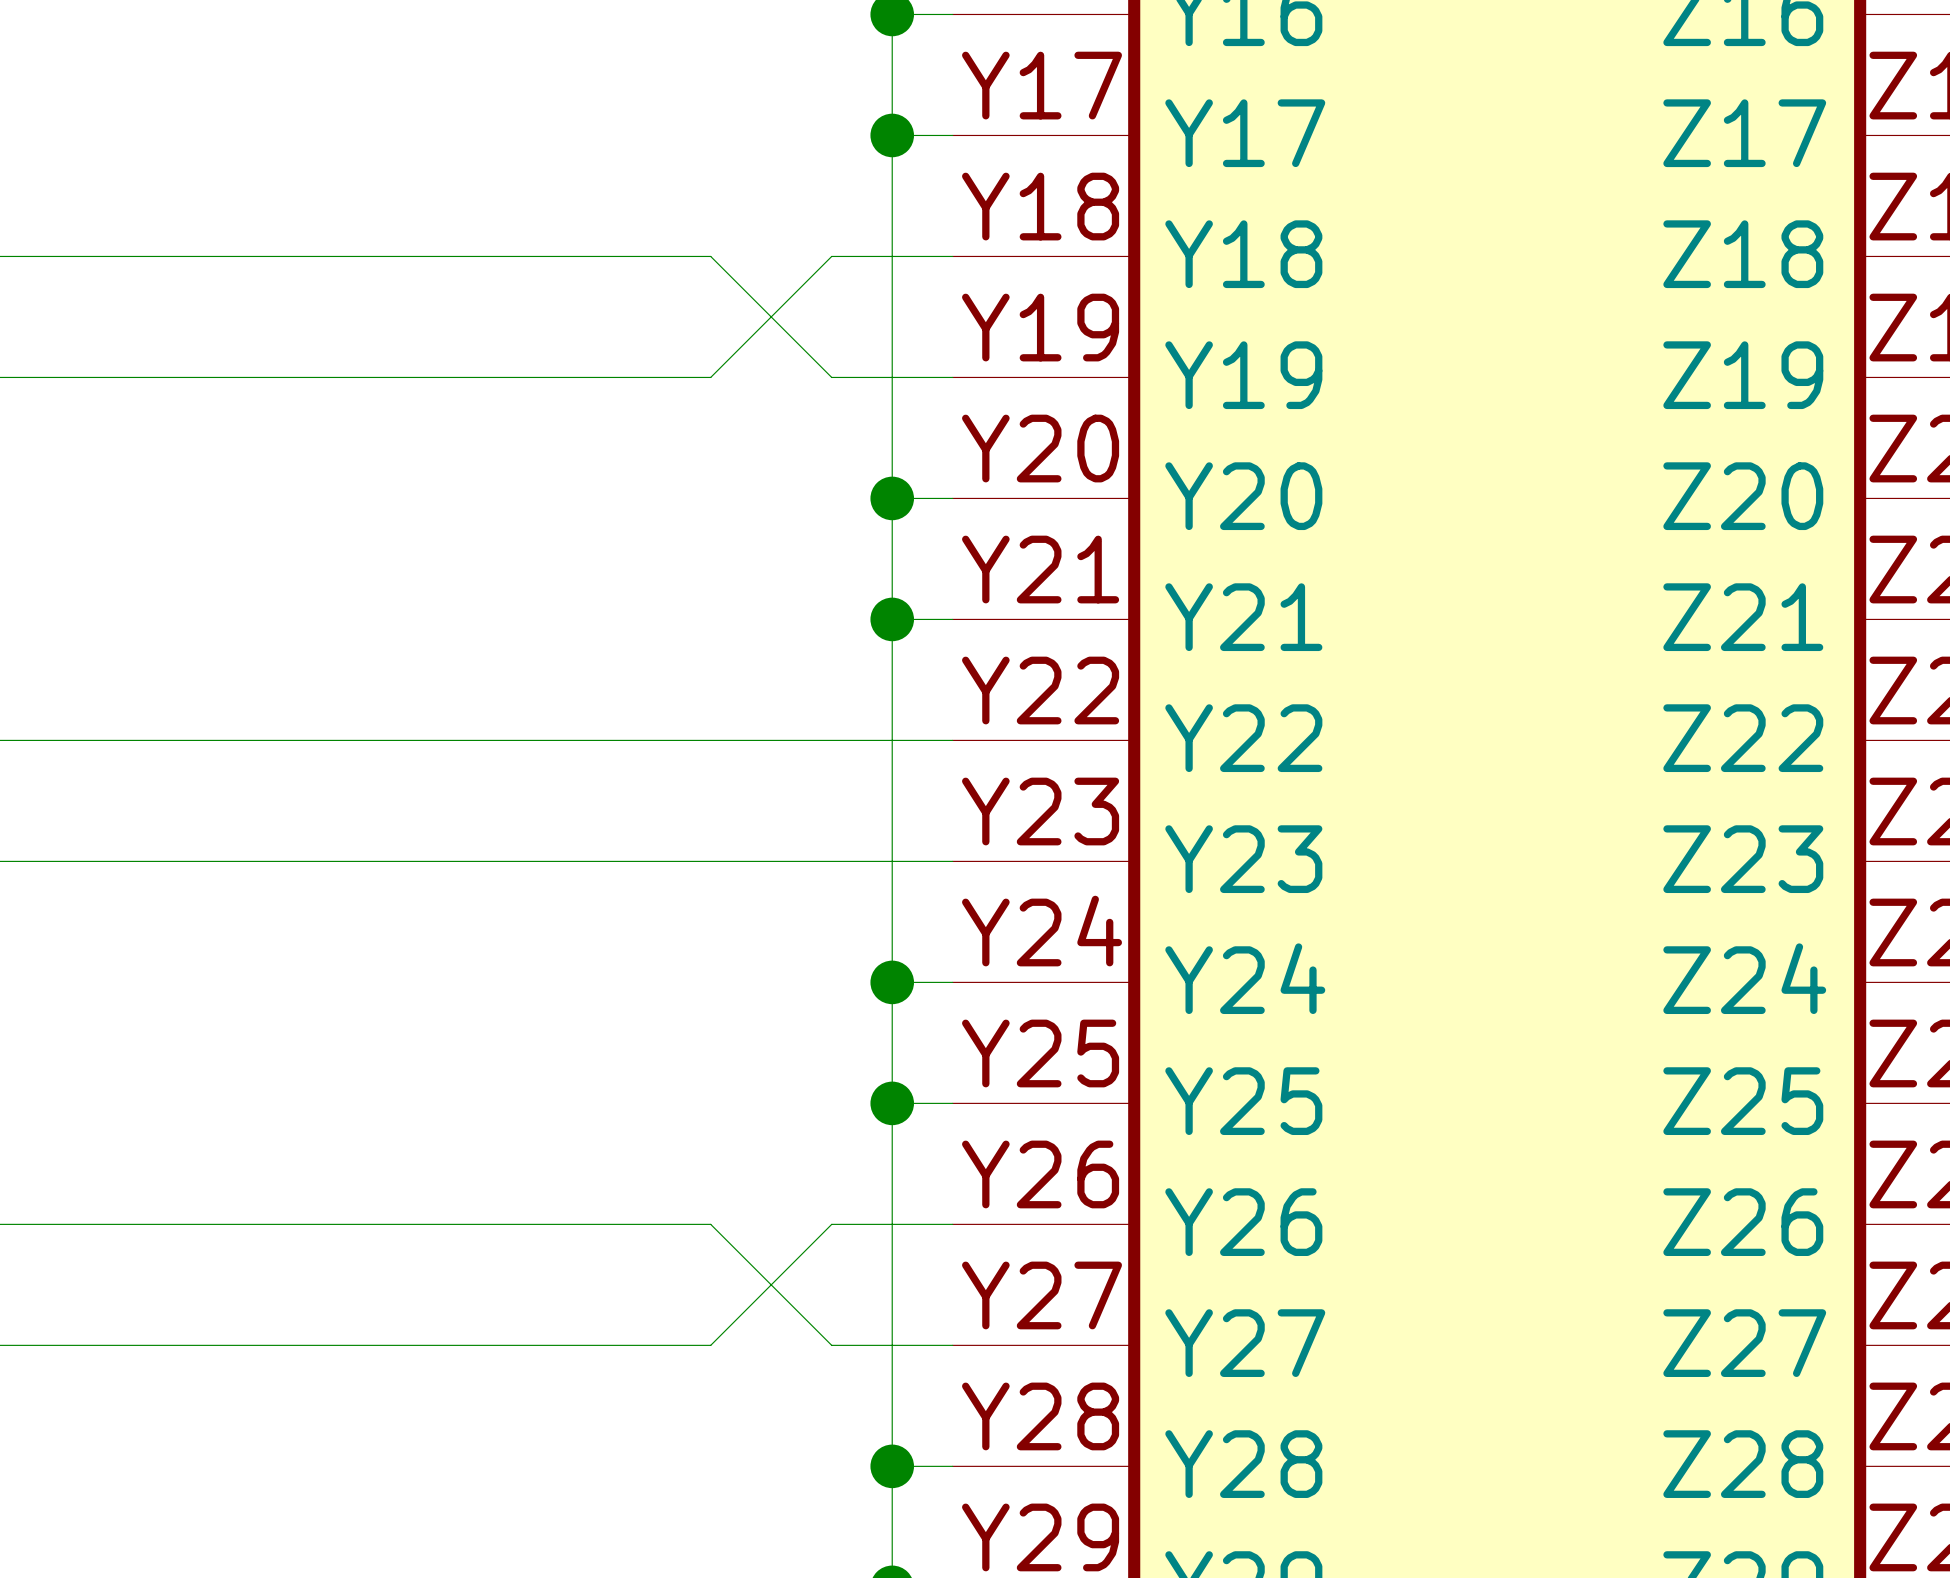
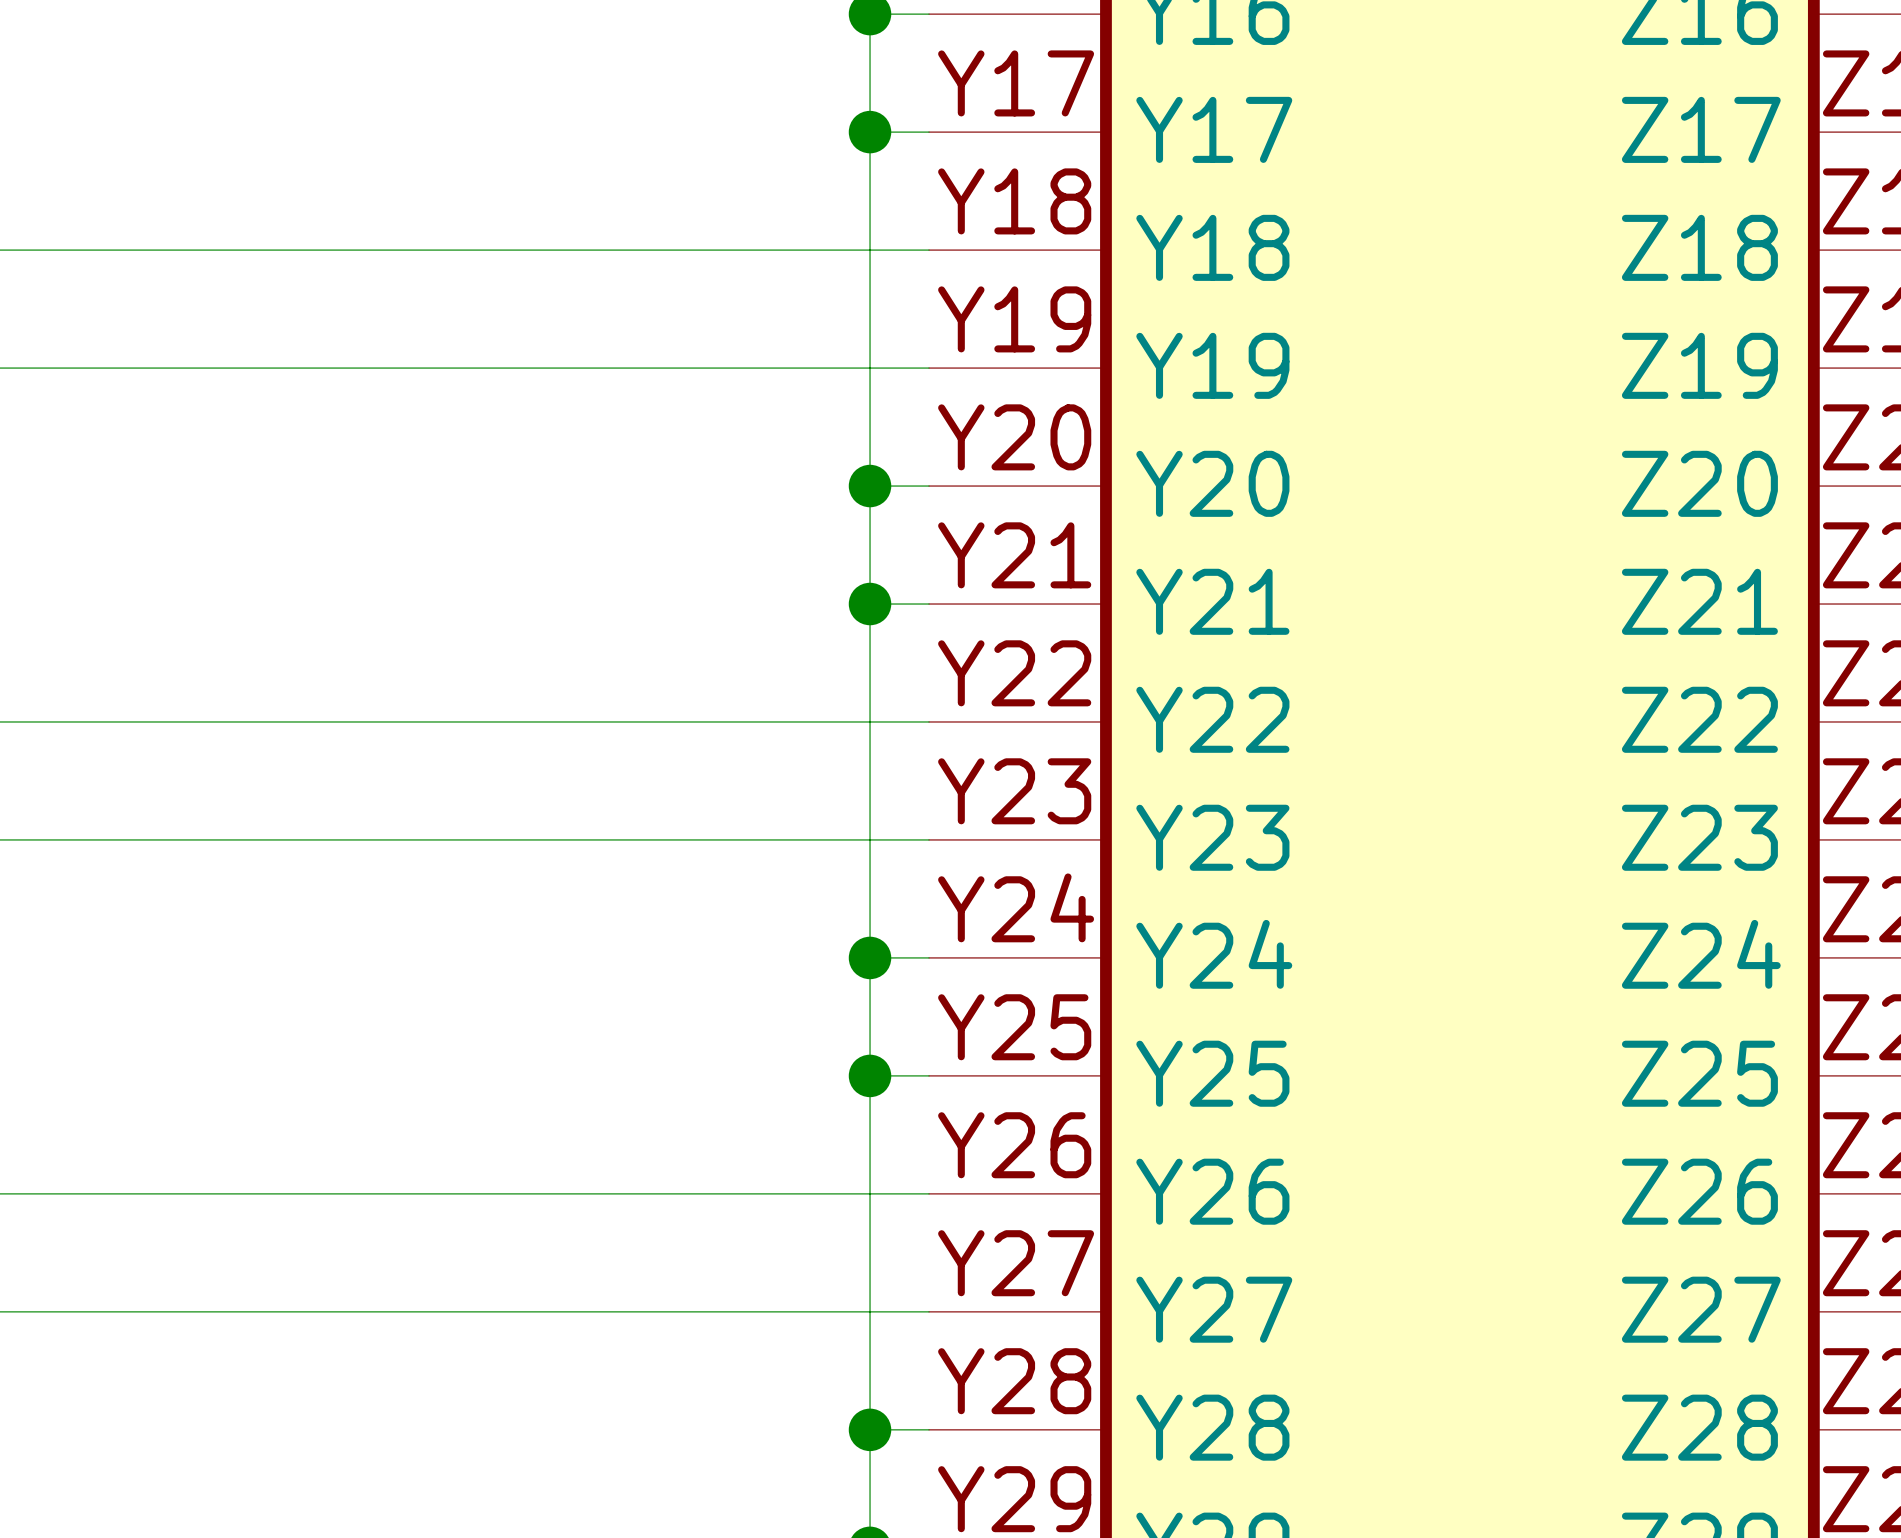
wire: (710, 256) (831, 377) -> (693, 250) (811, 250)
wire: (831, 256) (710, 377) -> (811, 368) (693, 368)
wire: (710, 1224) (831, 1345) -> (693, 1193) (811, 1193)
wire: (831, 1224) (710, 1345) -> (811, 1311) (693, 1311)

